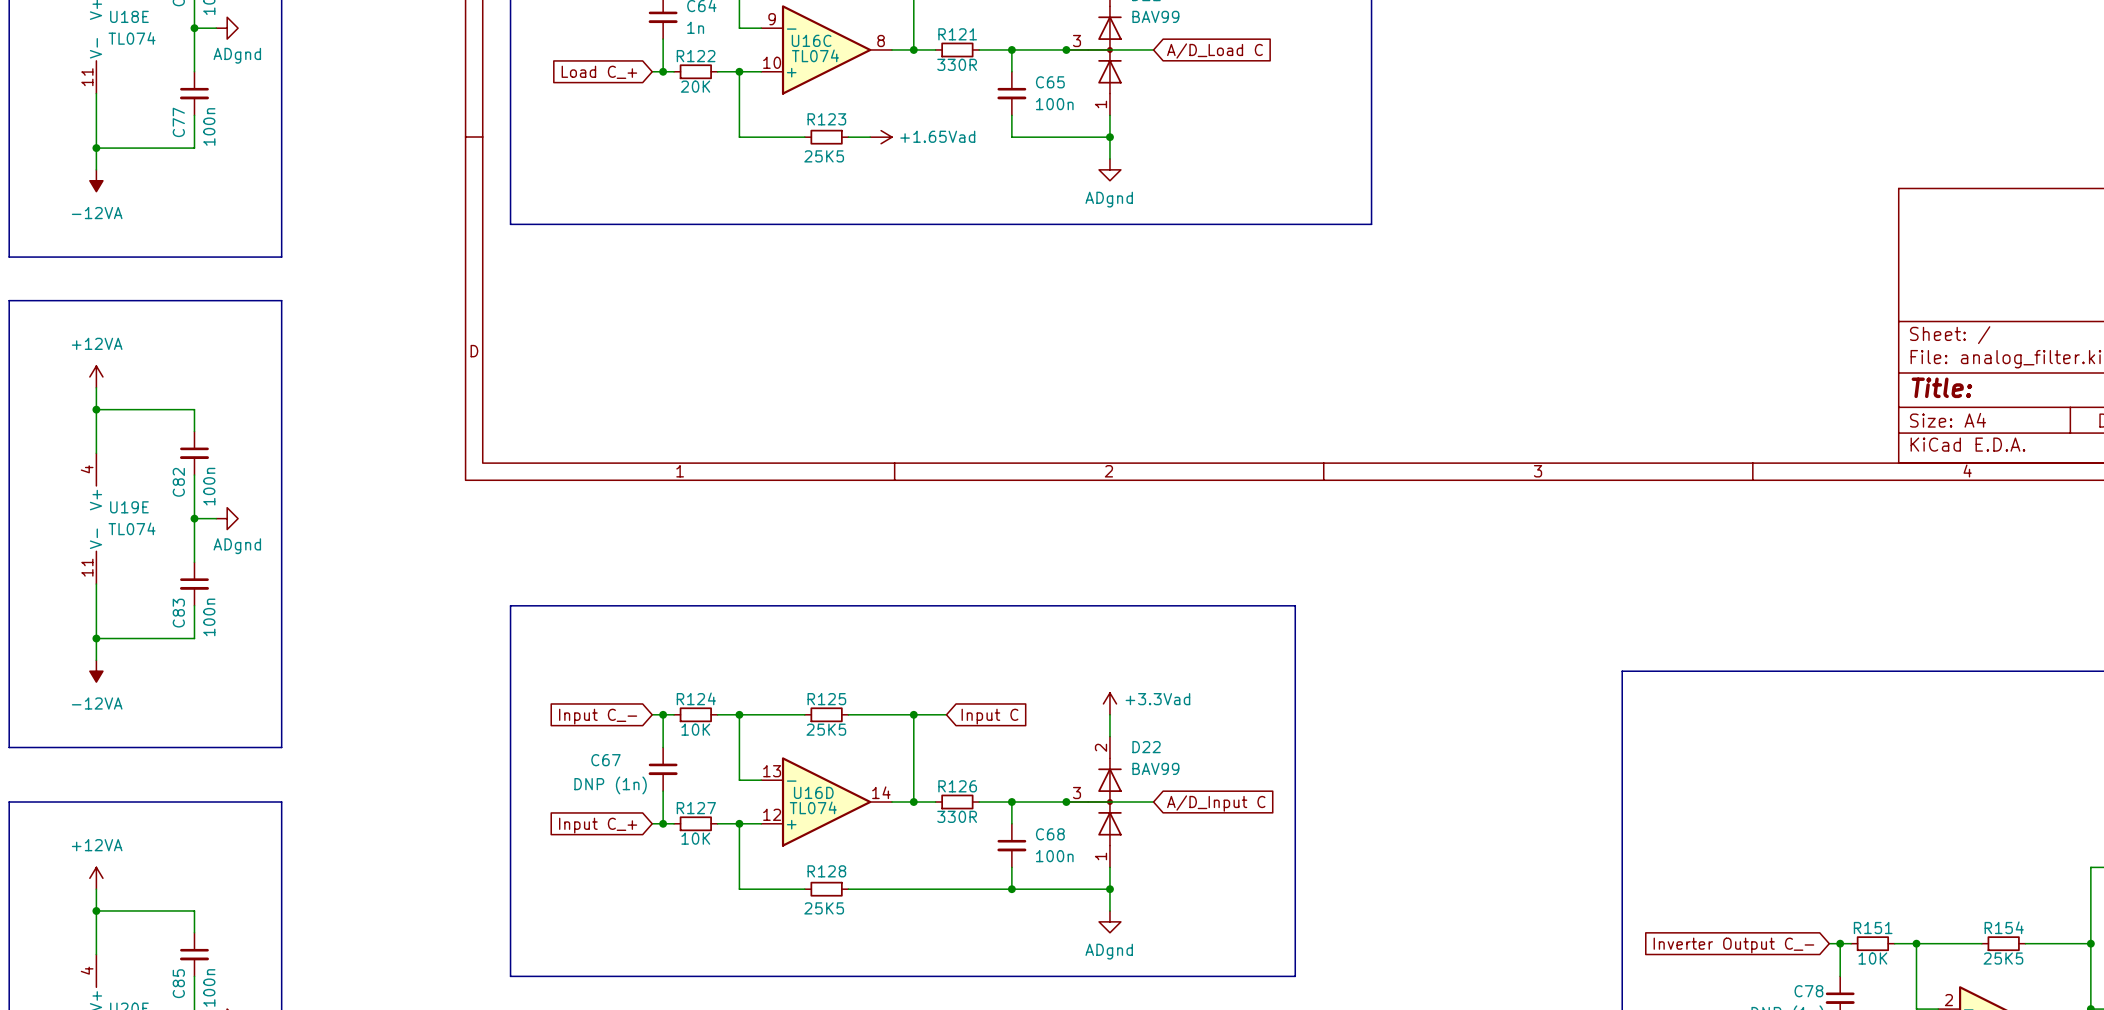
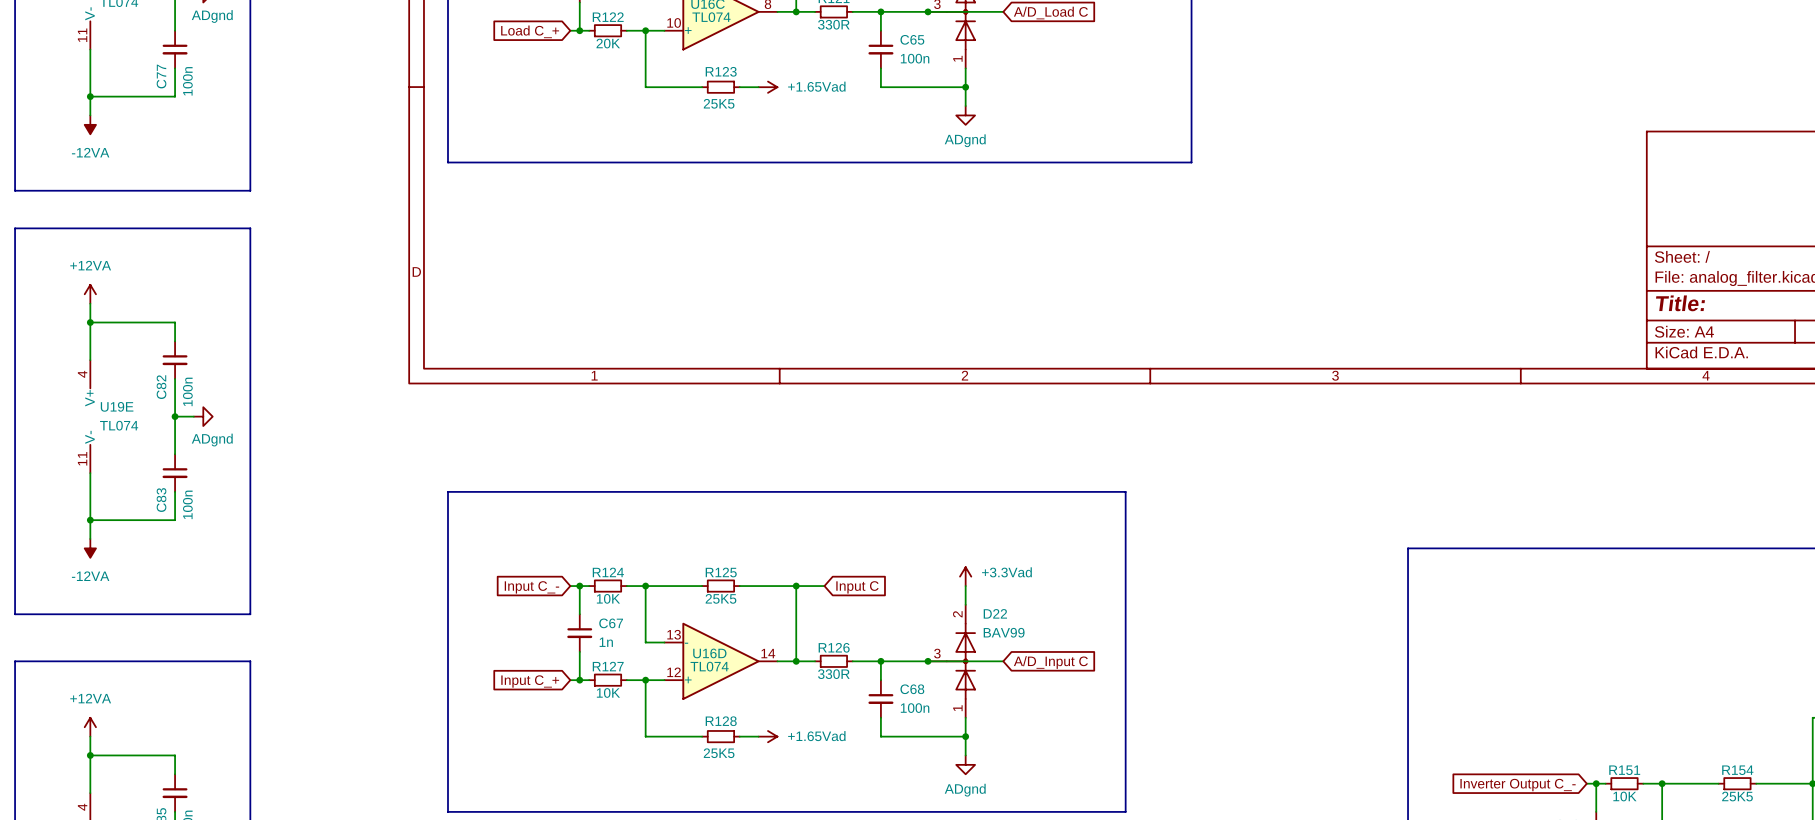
C67 name position: C67 (605, 760) -> C67 (611, 623)
C67 value: DNP (1n) (610, 785) -> 1n (606, 642)
wire: (870, 889) (1011, 889) -> none
power symbol: none -> +1.65Vad (768, 736)
junction: (1011, 889) -> none

